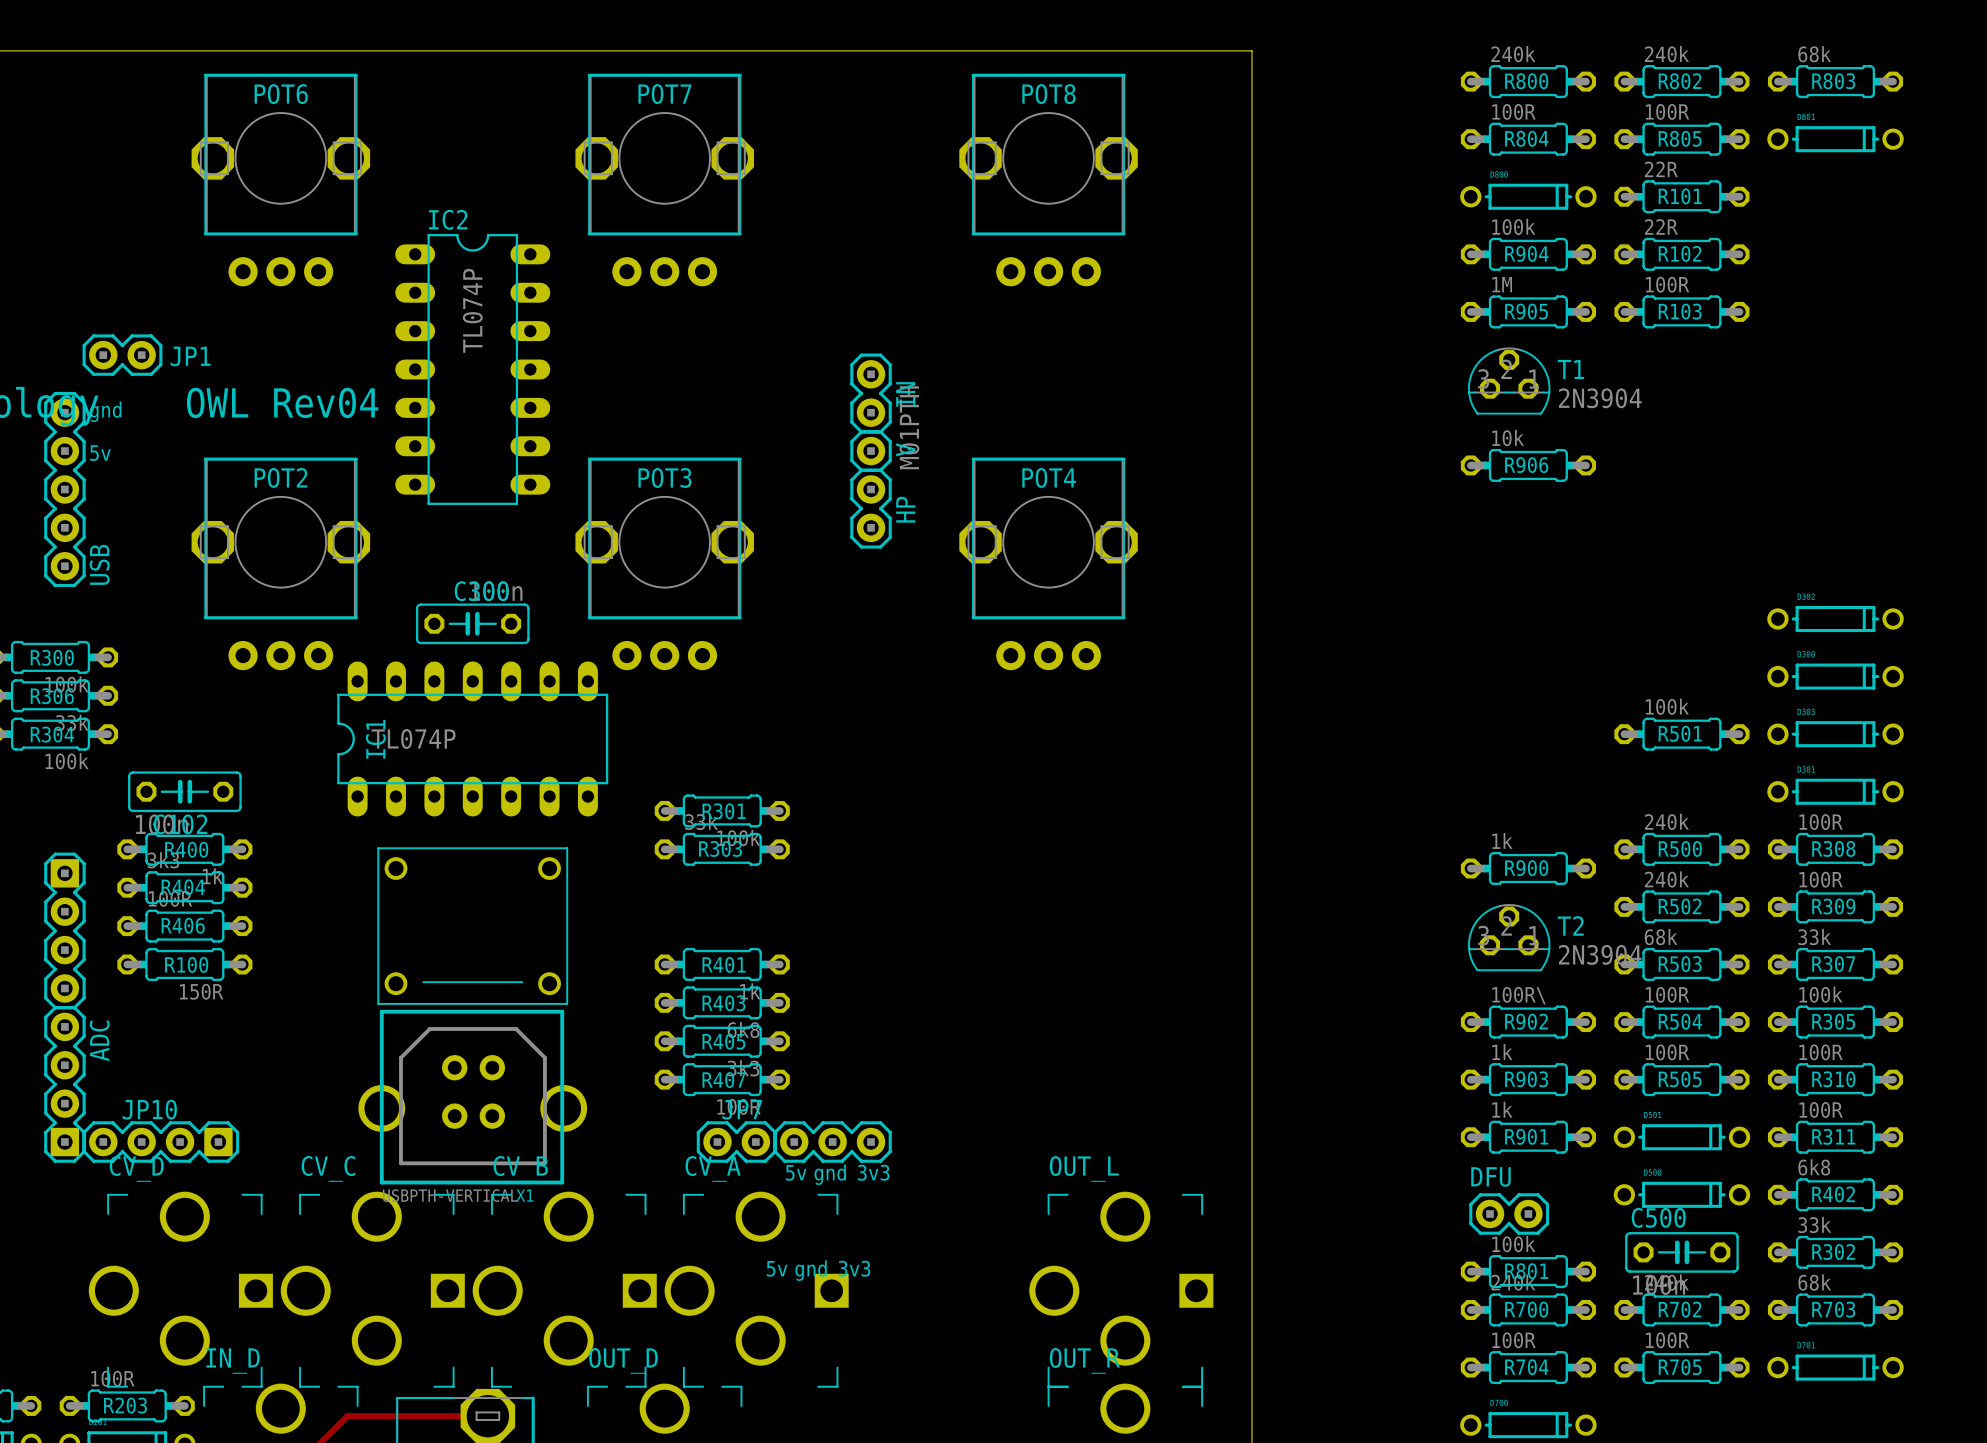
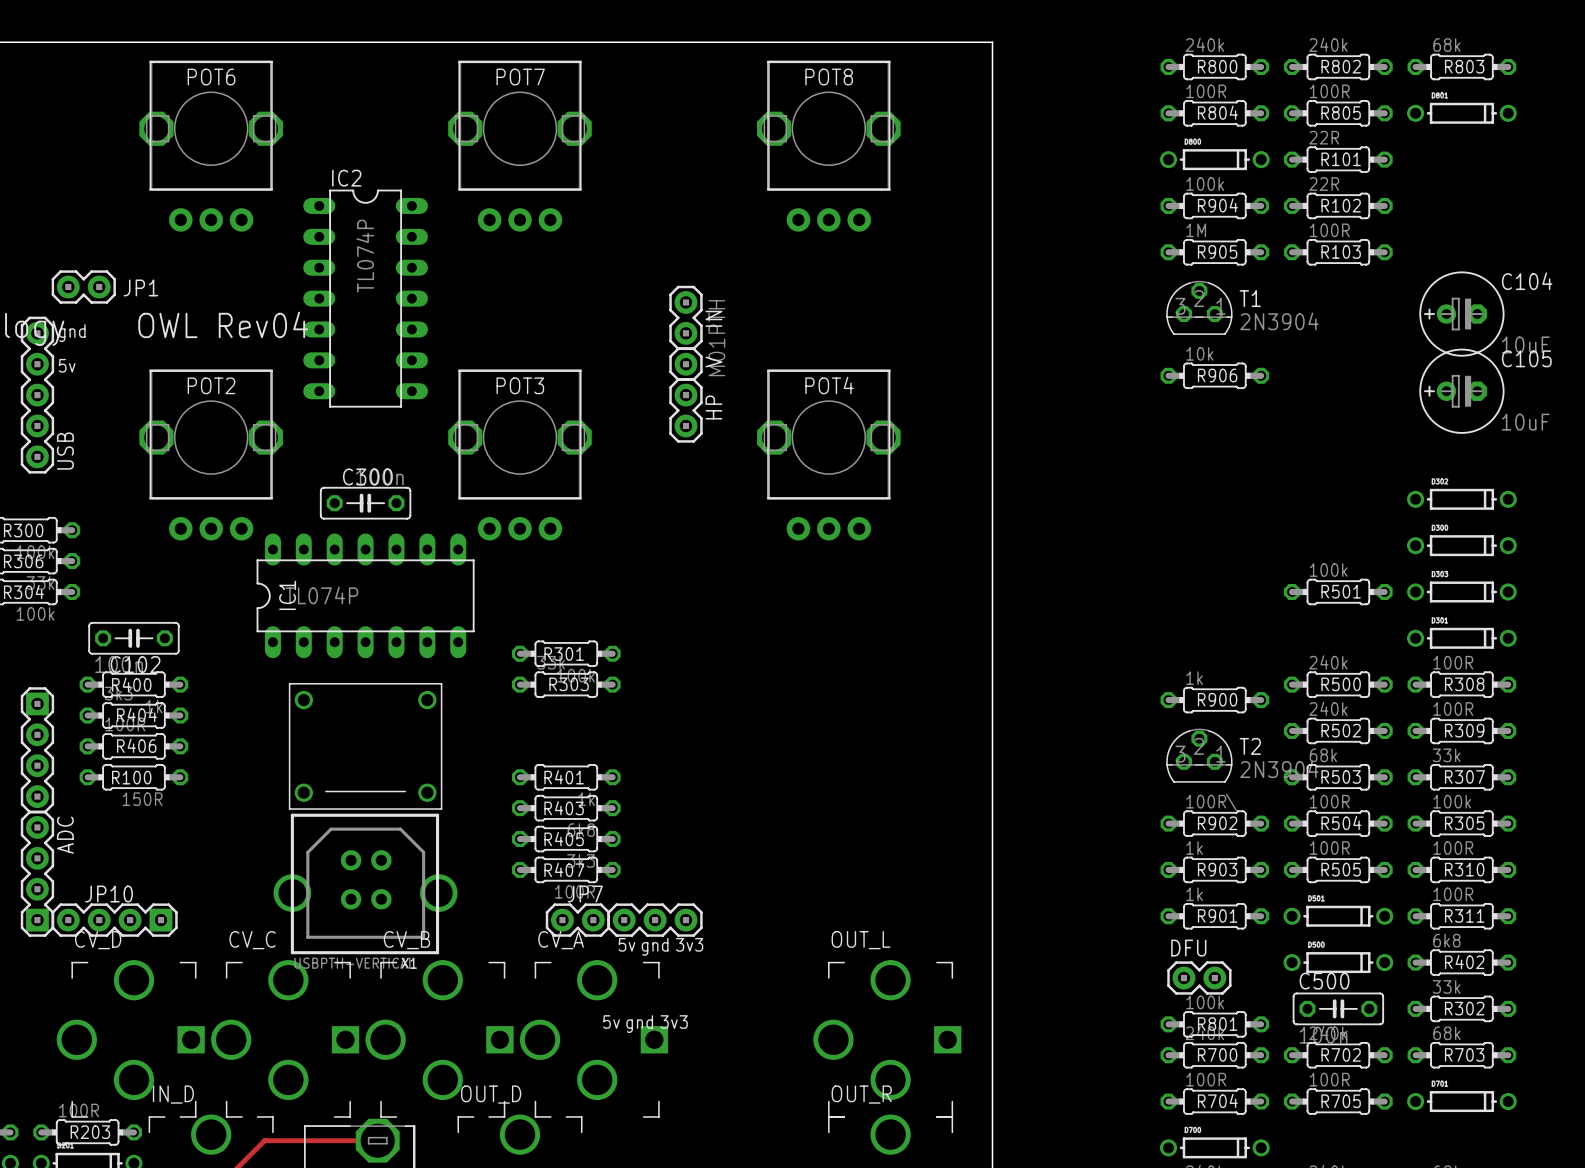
C104: none -> 10uF (1461, 314)
C105: none -> 10uF (1461, 391)

